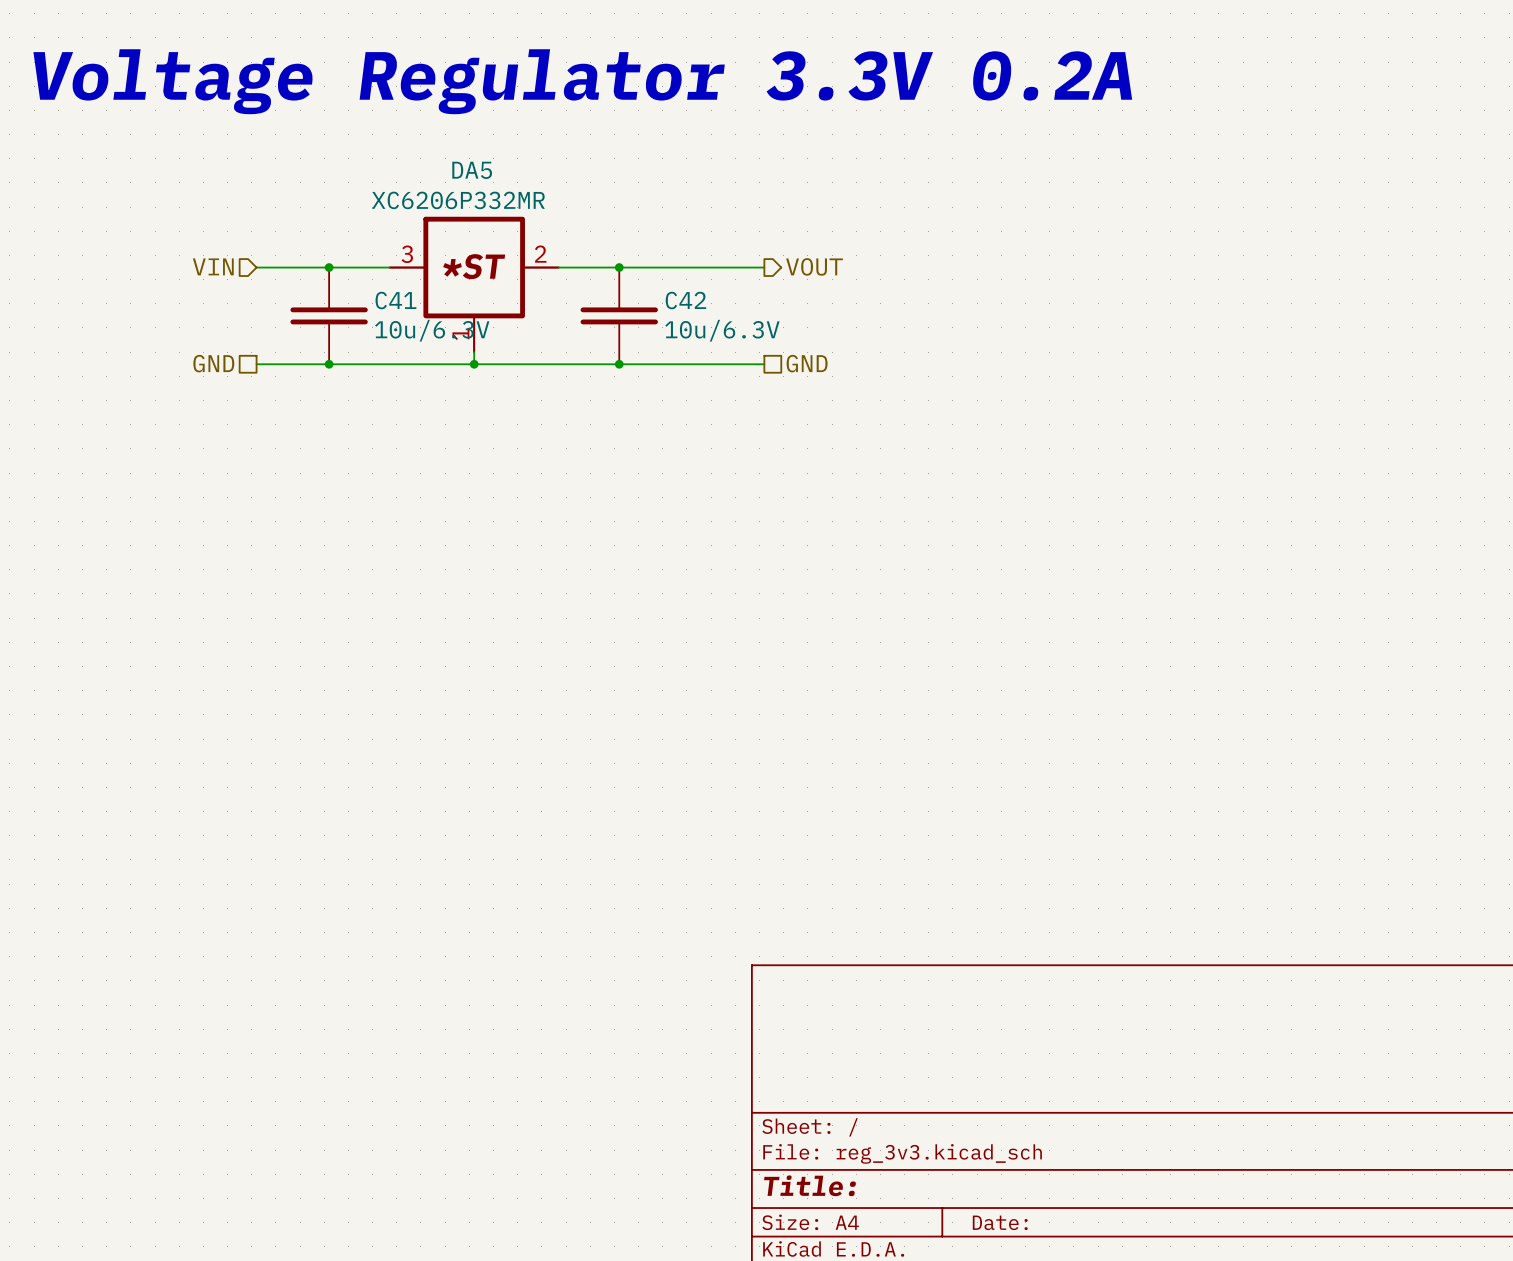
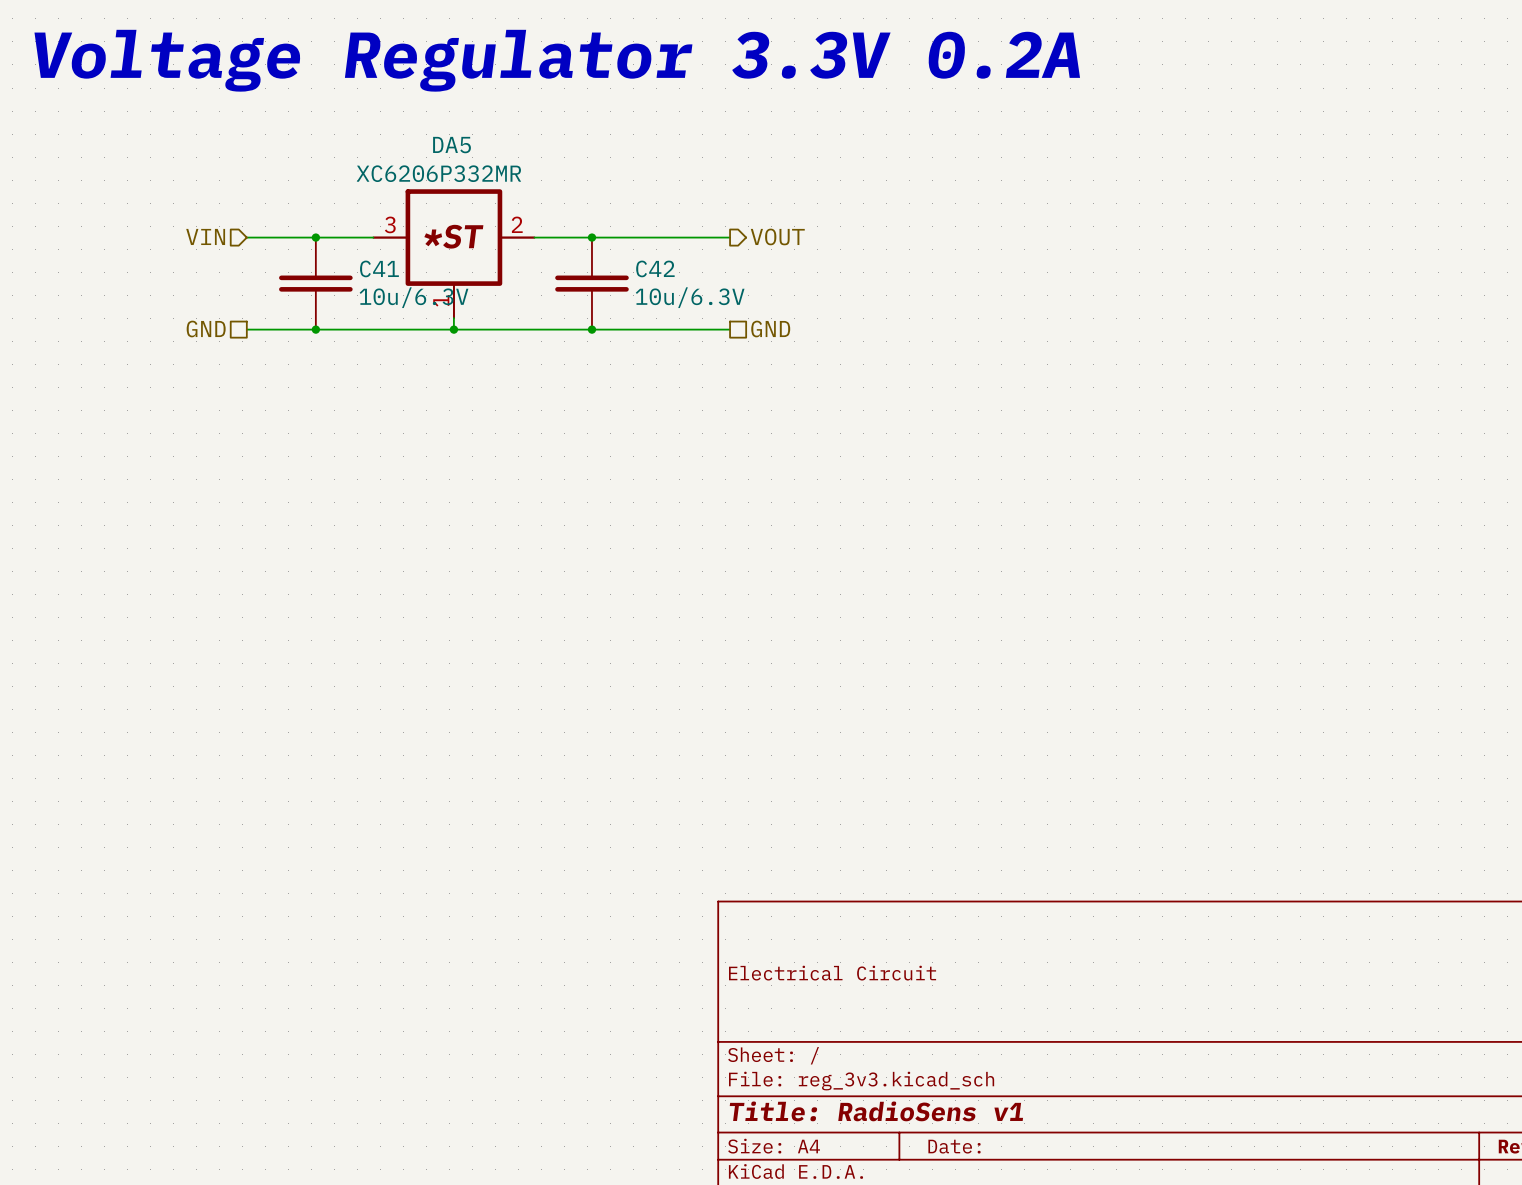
title block: none -> Electrical Circuit (832, 973)
title block: Title: (809, 1185) -> Title: RadioSens v1 (876, 1111)

